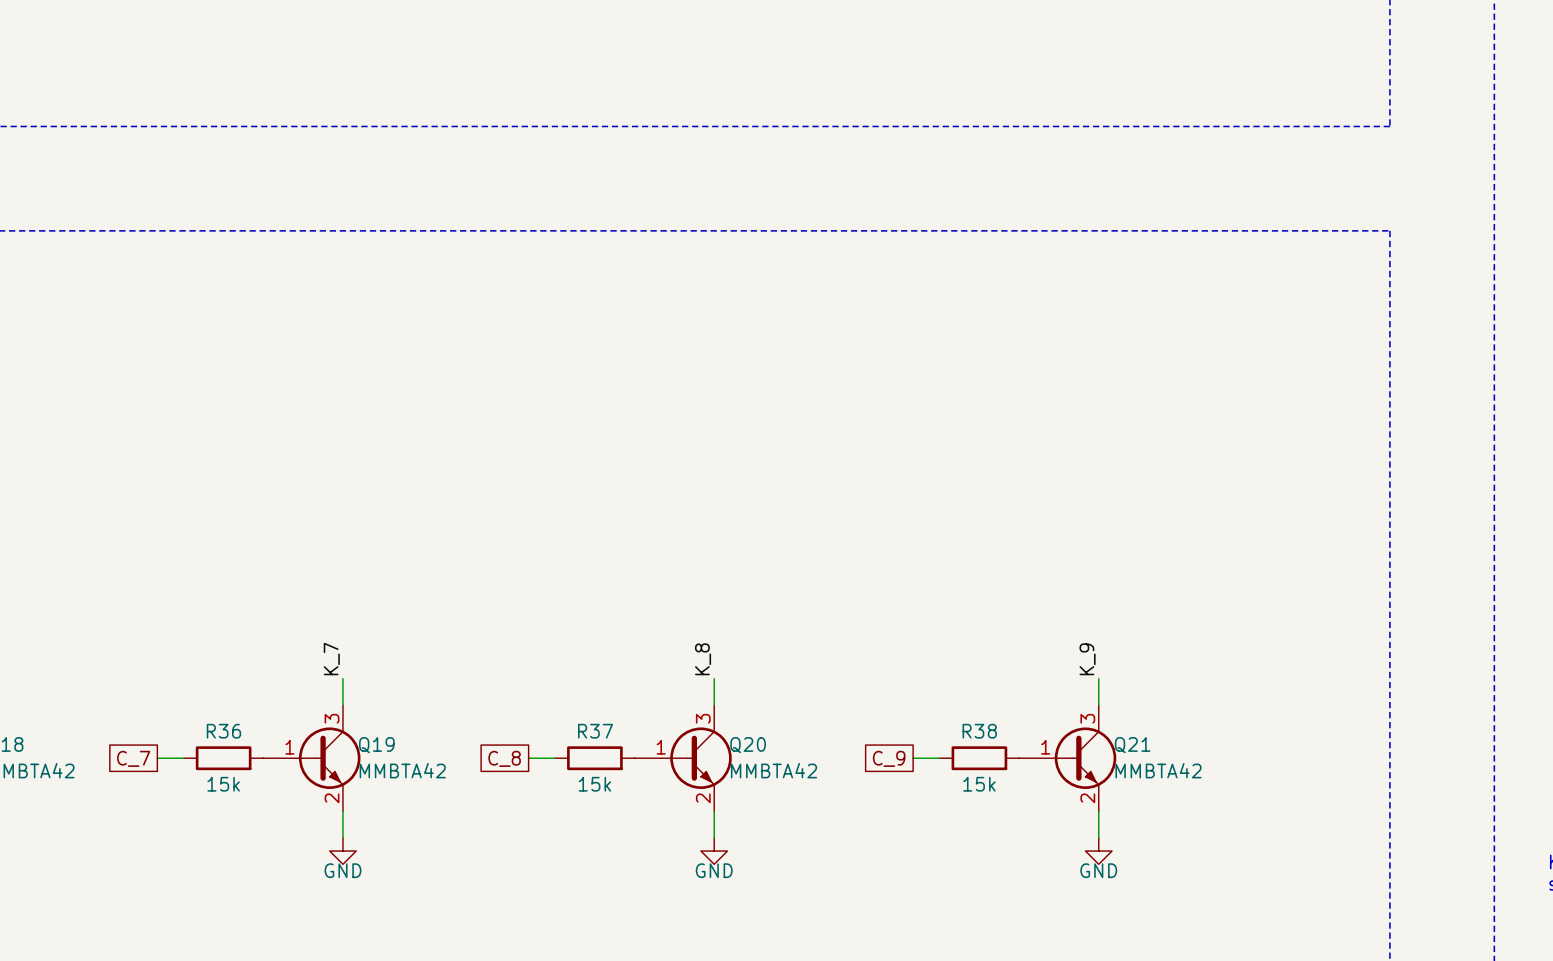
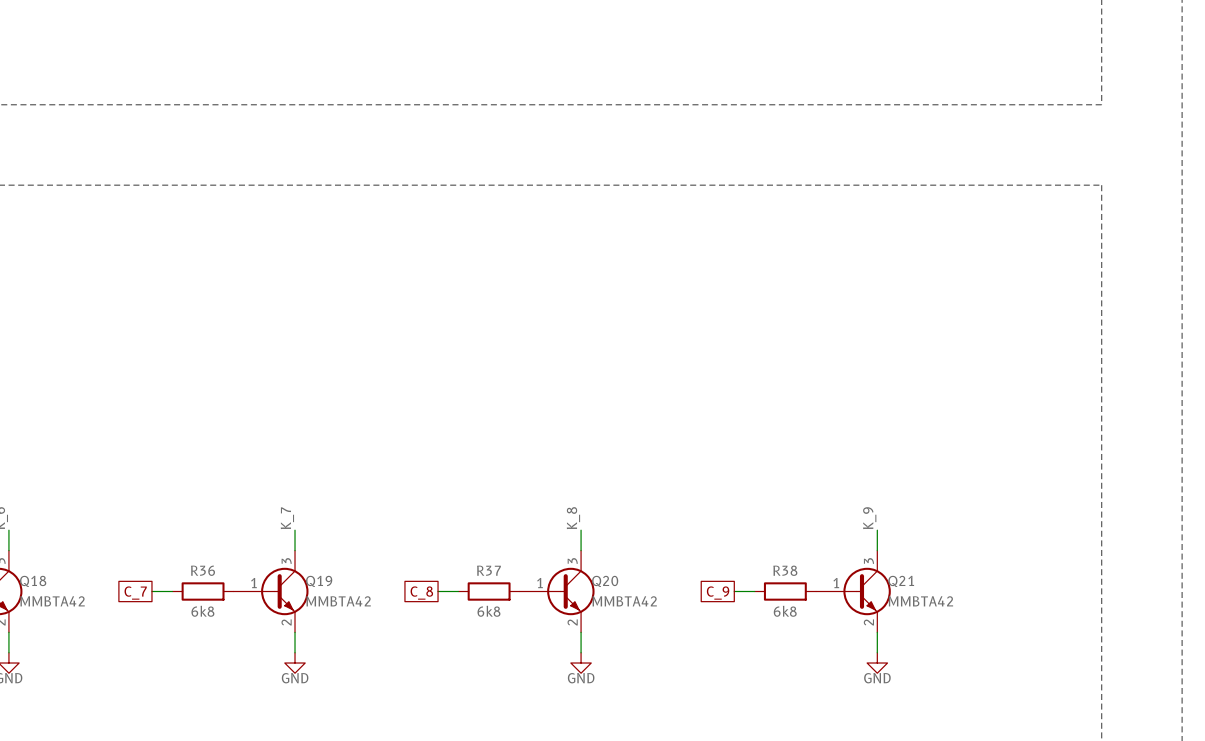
R36 value: 15k (223, 784) -> 6k8 (202, 611)
R37 value: 15k (594, 784) -> 6k8 (488, 611)
R38 value: 15k (979, 784) -> 6k8 (785, 611)

